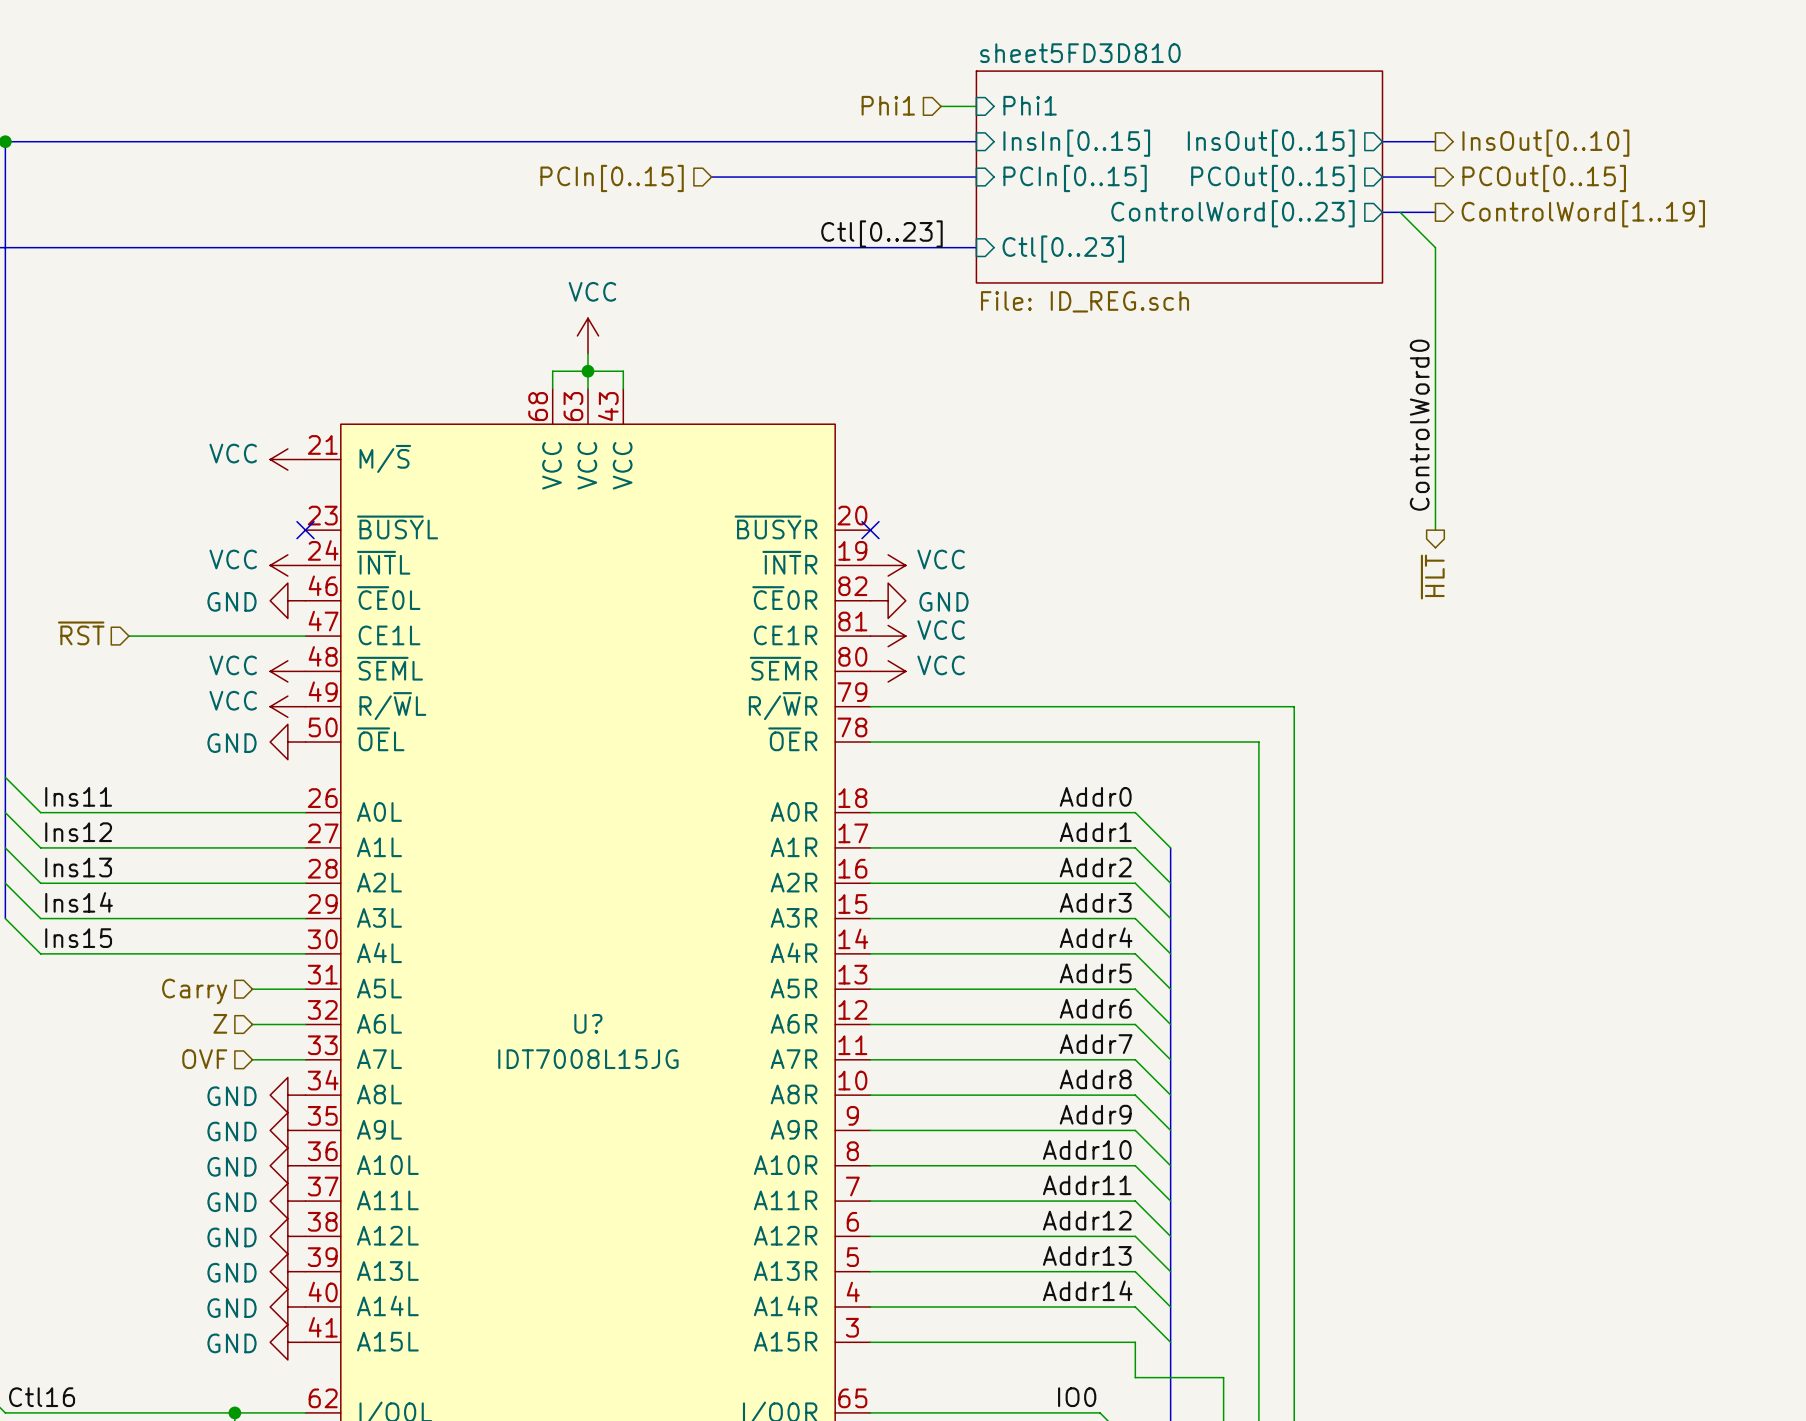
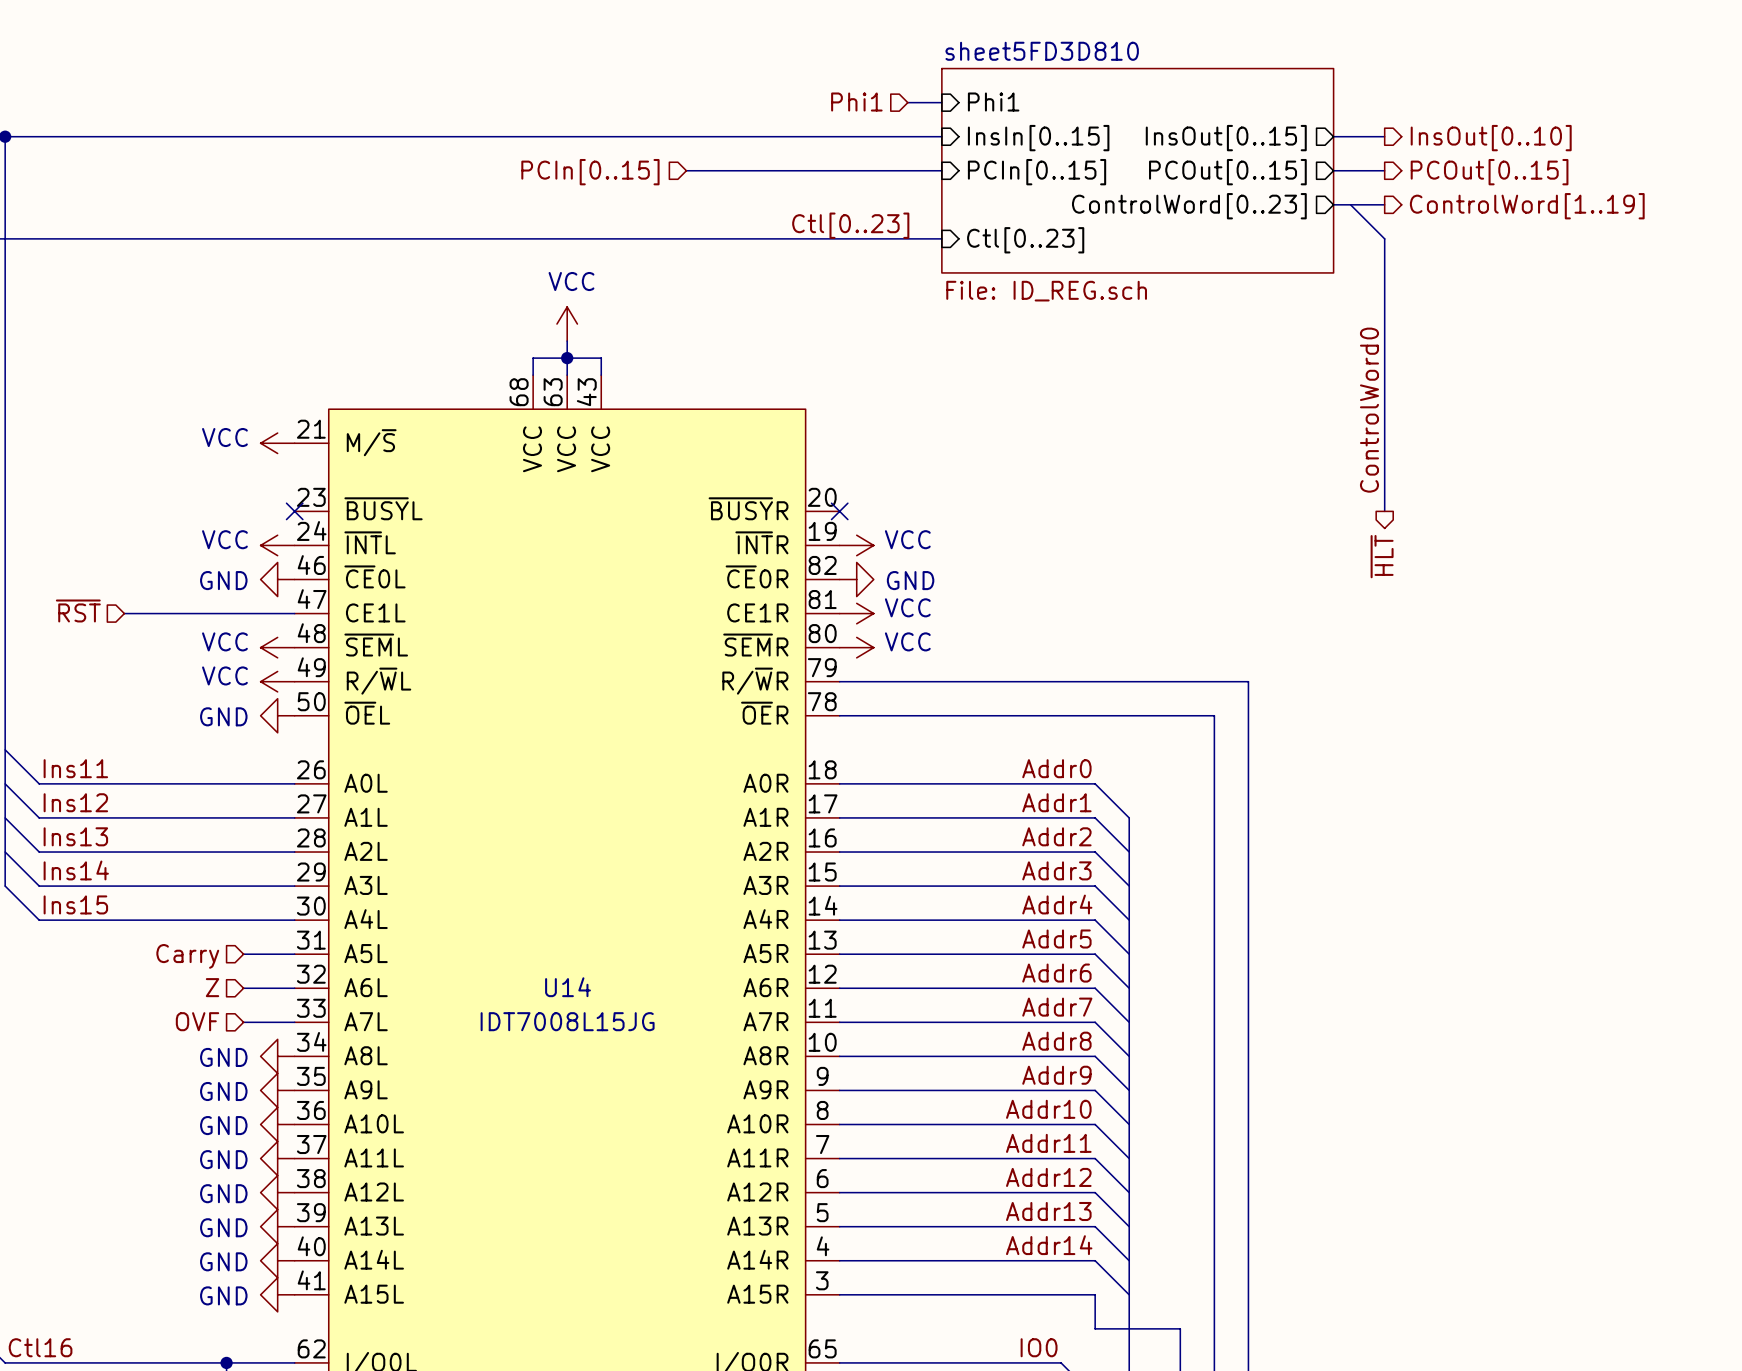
U? name: U? (588, 1023) -> U14 (568, 987)

